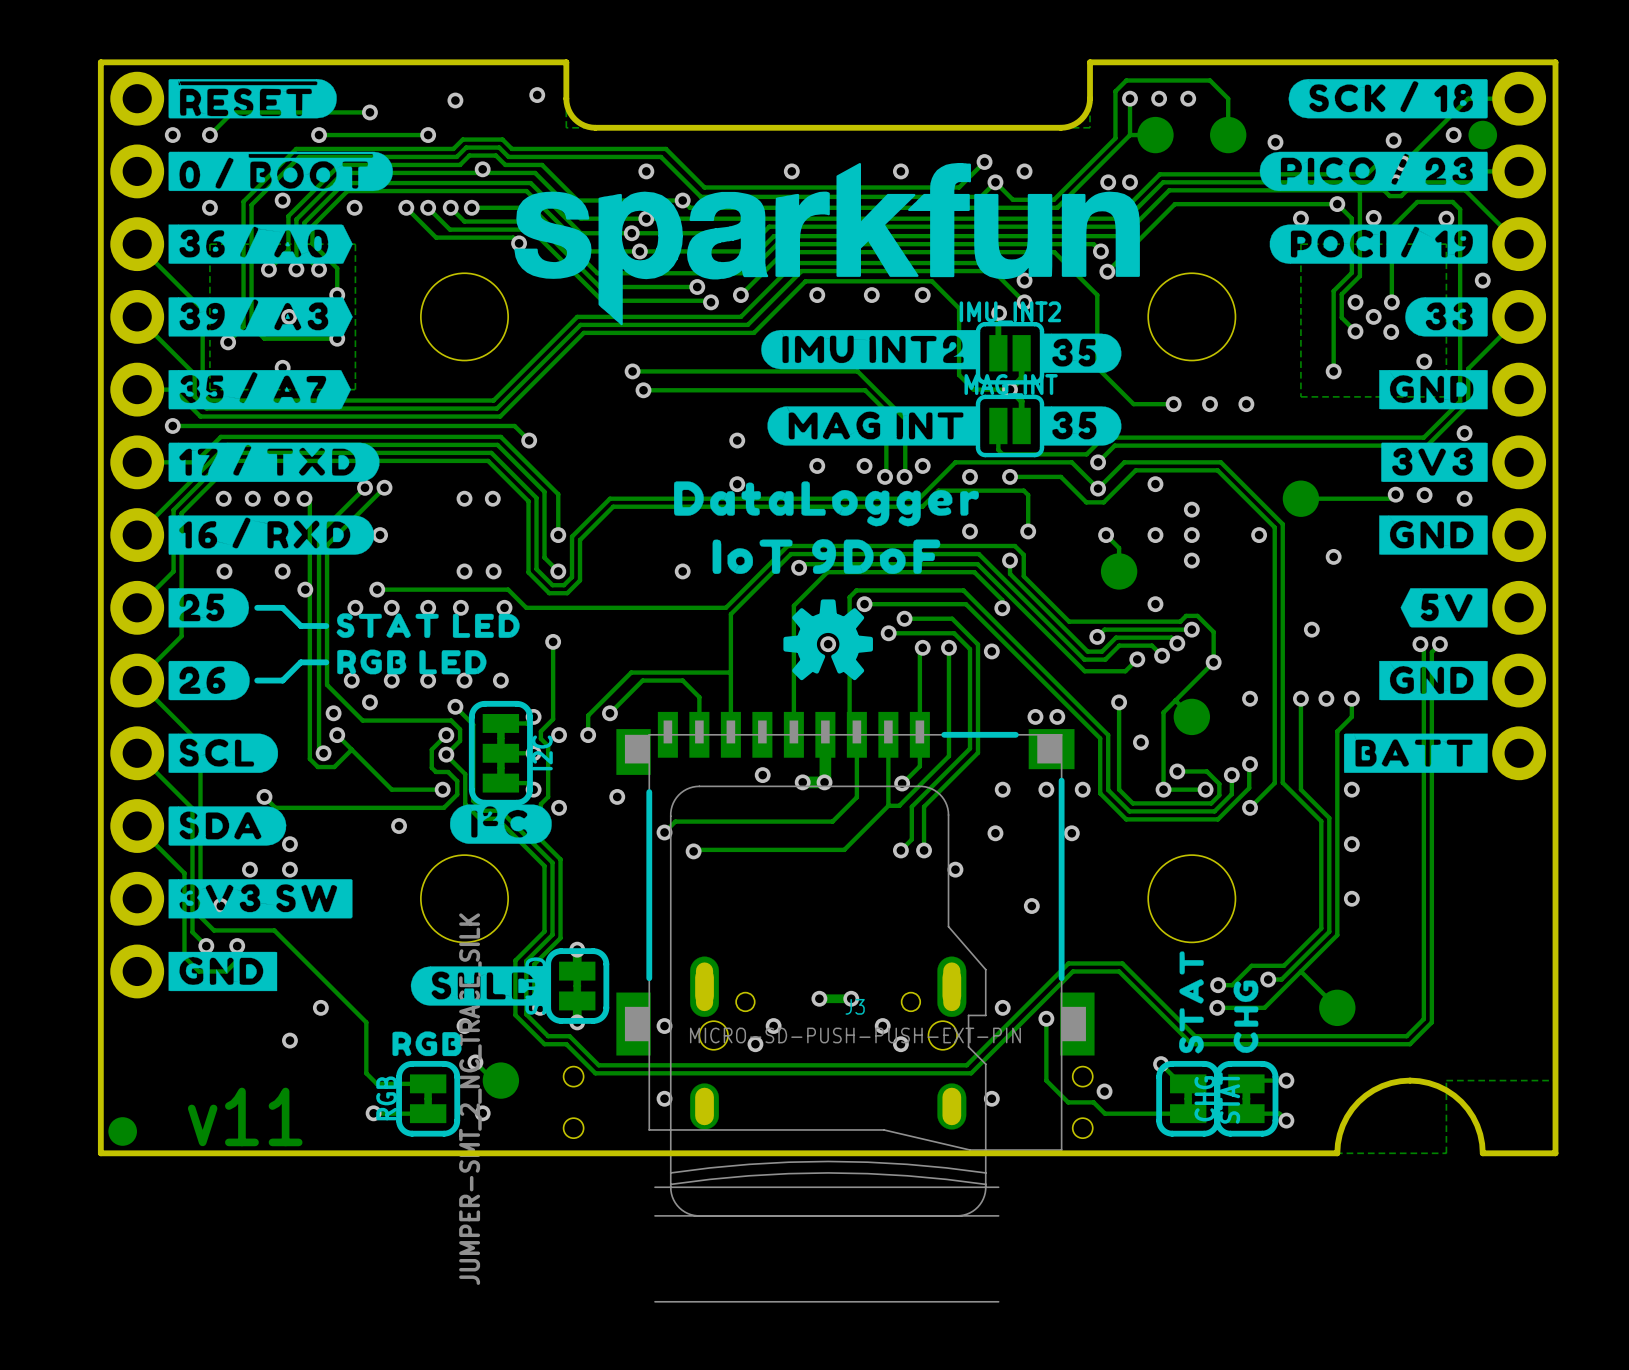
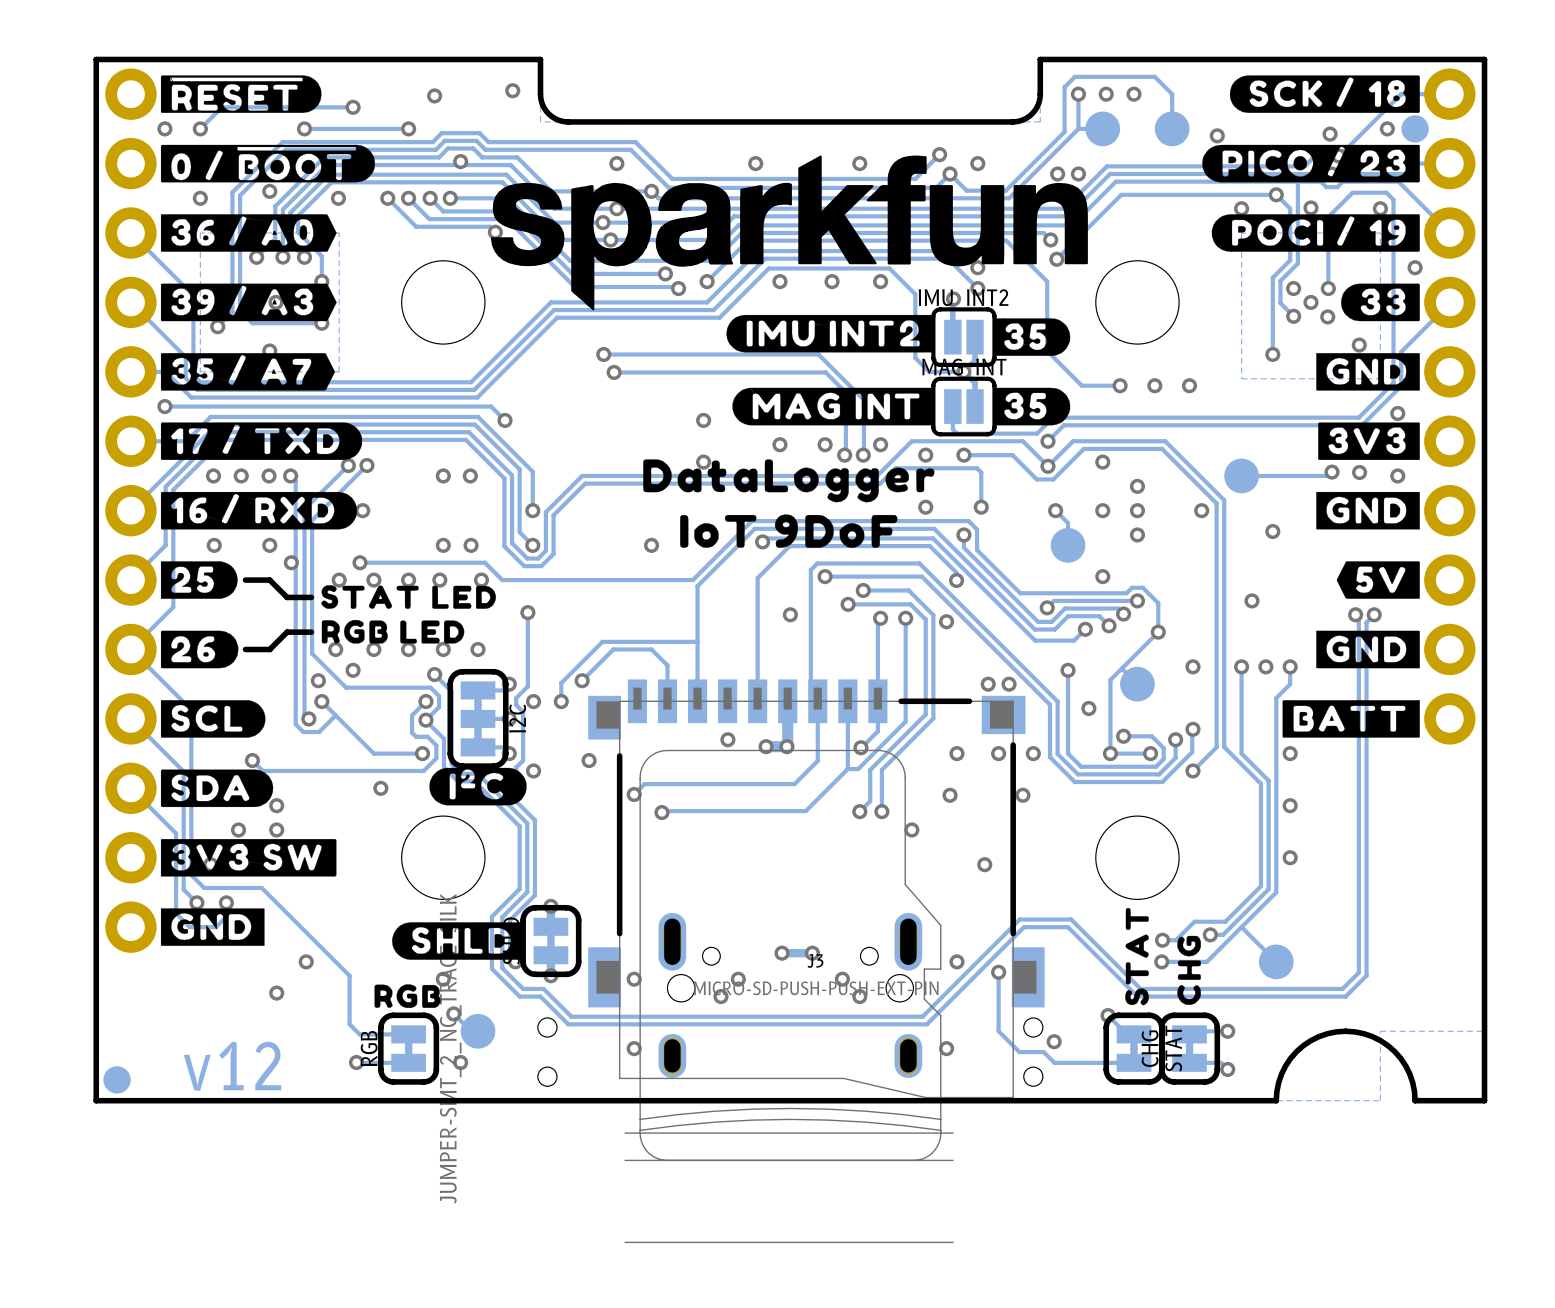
drawing: [783, 599, 873, 681] -> none
text: v11 (245, 1116) -> v12 (232, 1066)

